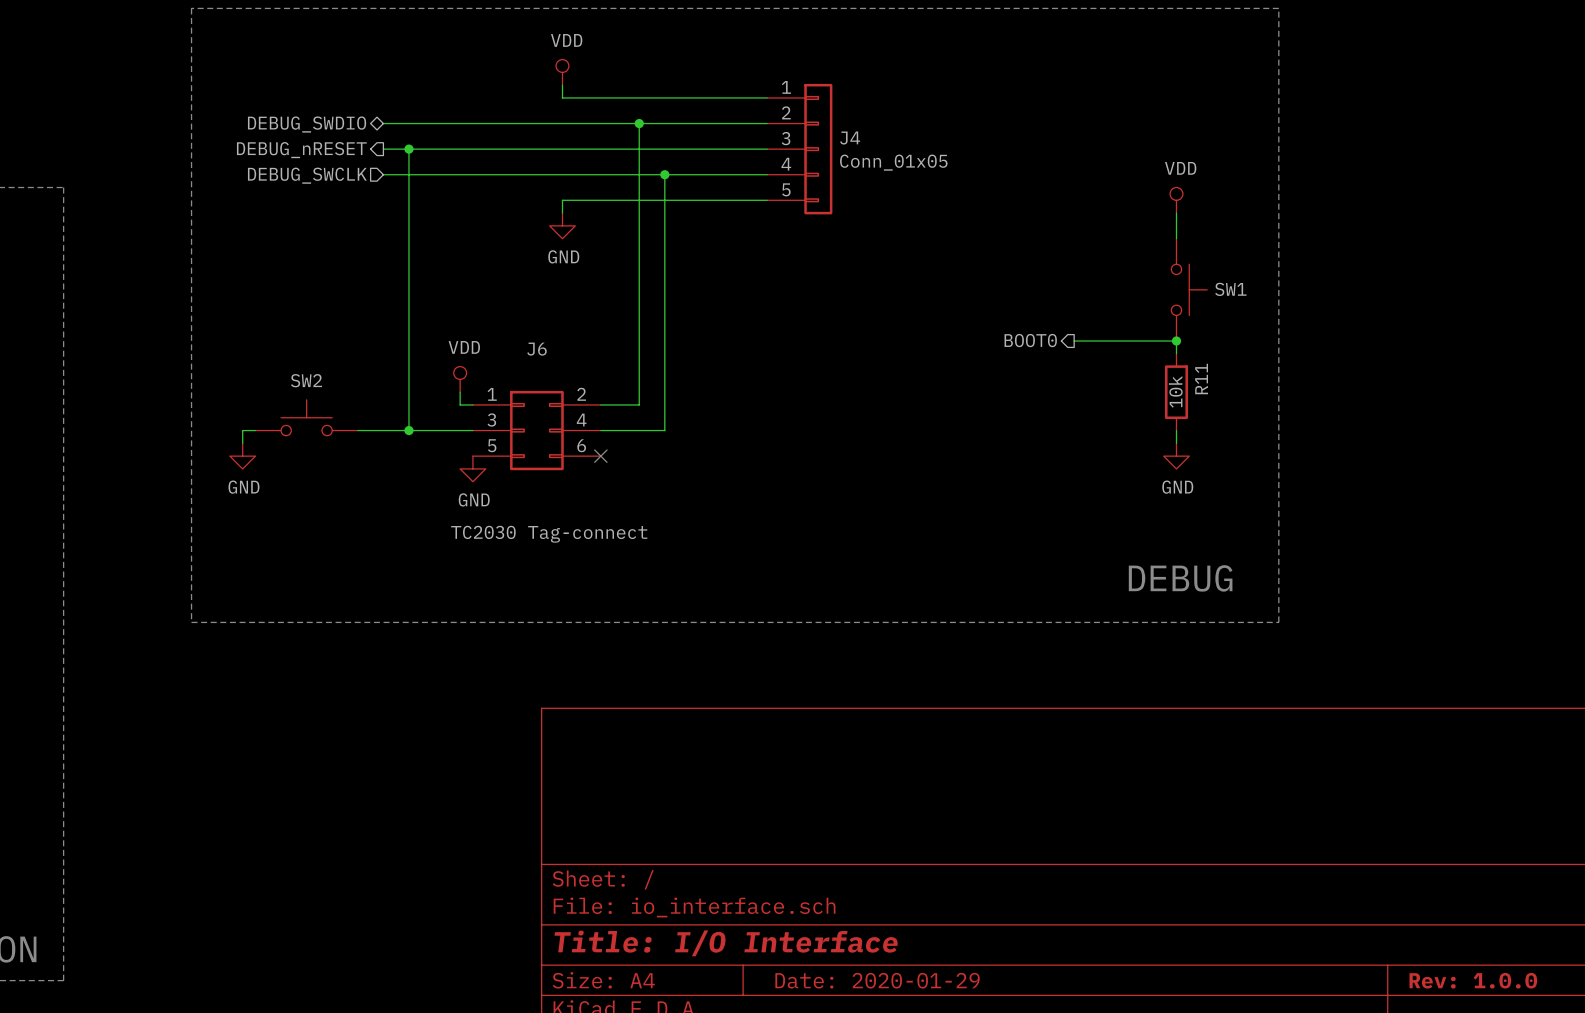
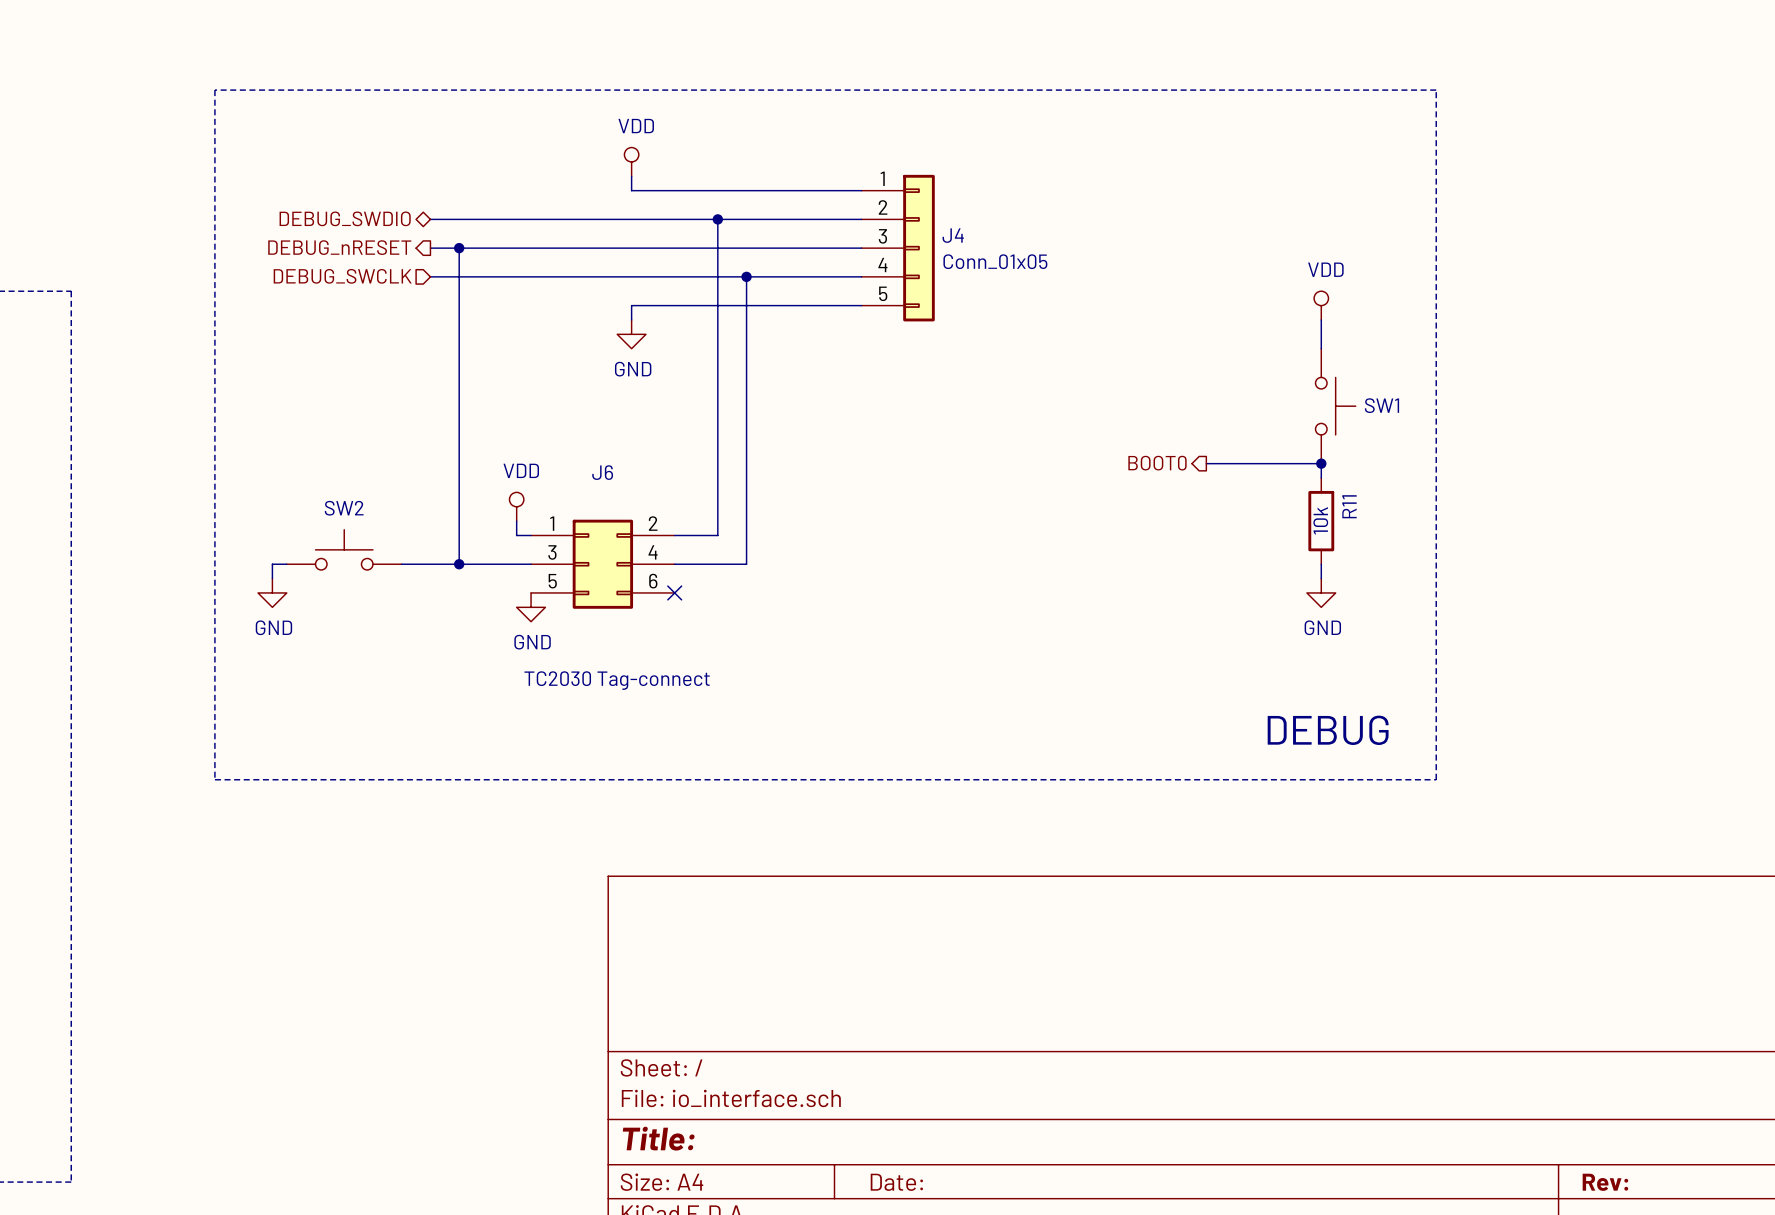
title block: Title: I/O Interface (726, 943) -> Title: (658, 1138)
title block: Date: 2020-01-29 (877, 980) -> Date: (896, 1182)
title block: Rev: 1.0.0 (1473, 980) -> Rev: (1605, 1182)

